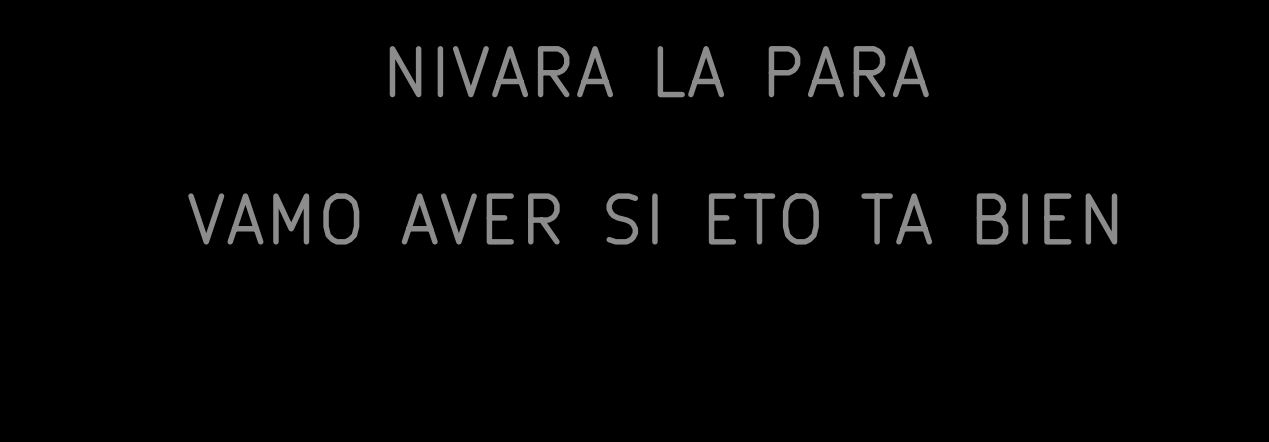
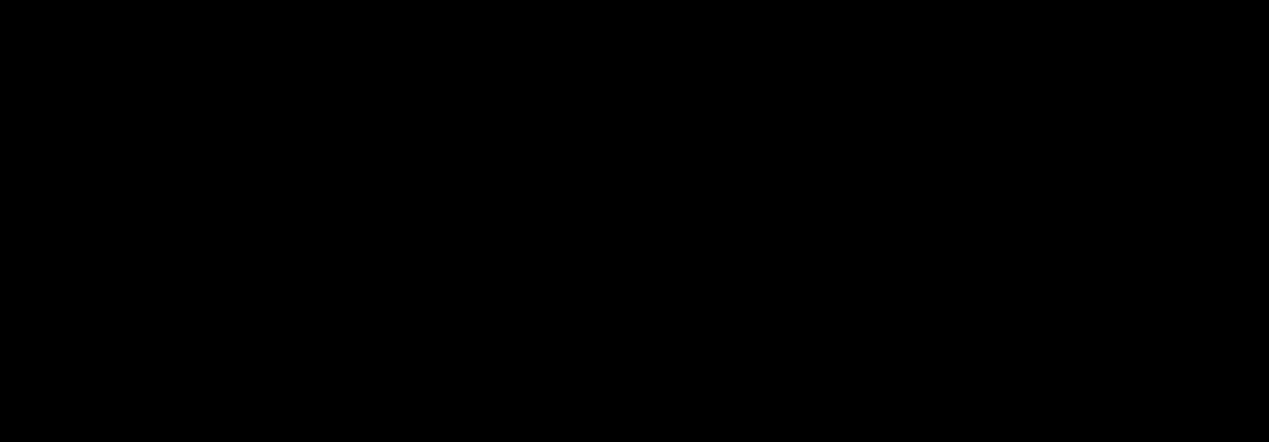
text: NIVARA LA PARA (659, 71) -> none
text: VAMO AVER SI ETO TA BIEN (652, 218) -> none

